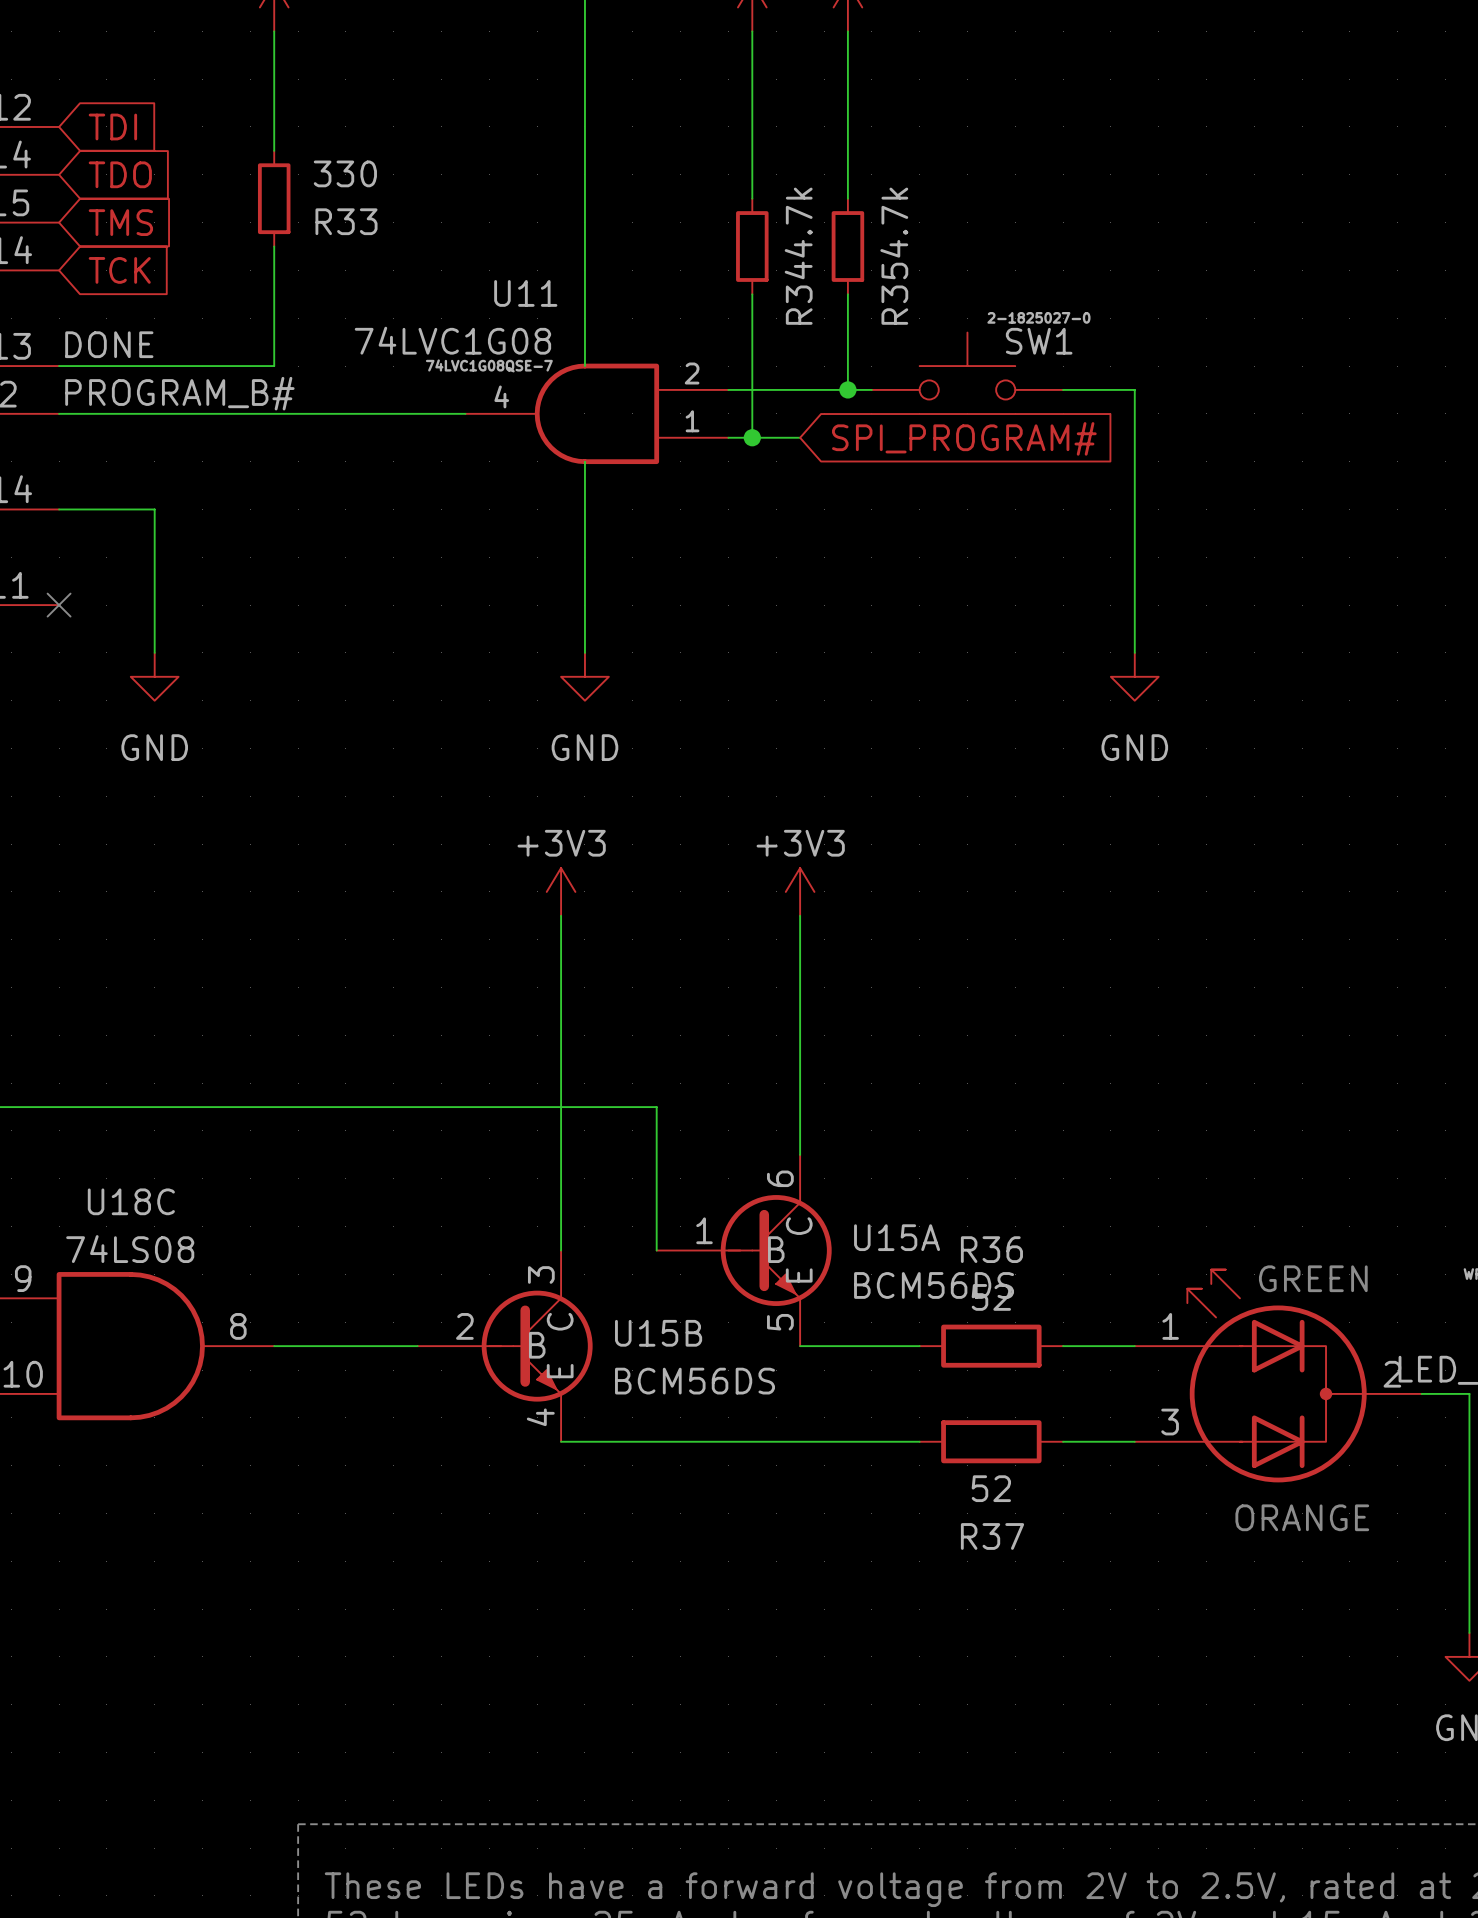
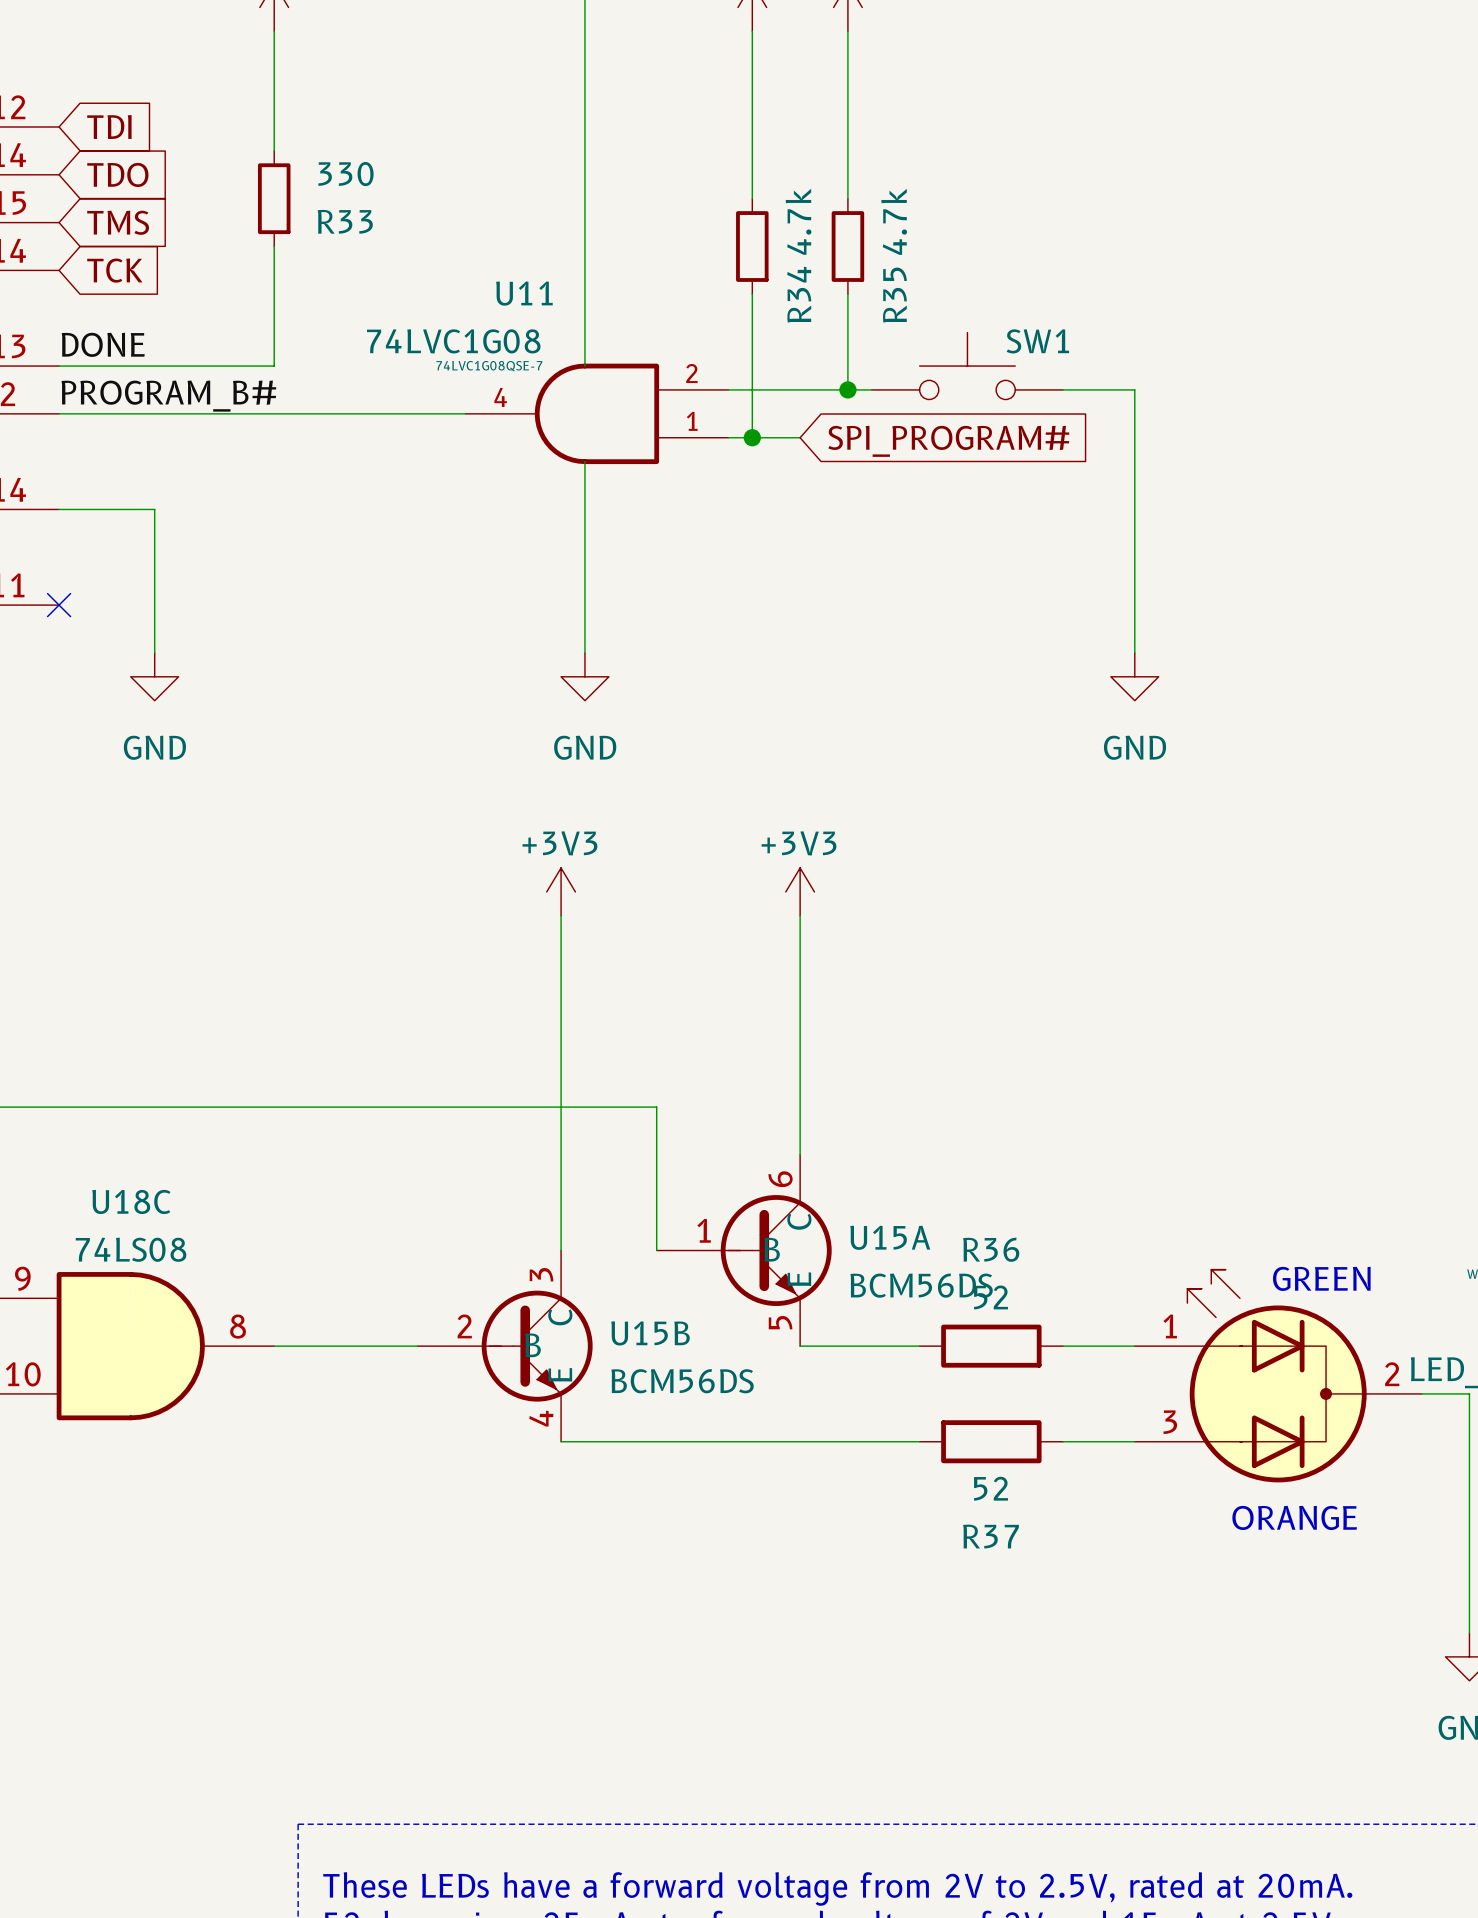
SW1 text: 2-1825027-0 (1038, 317) -> none

